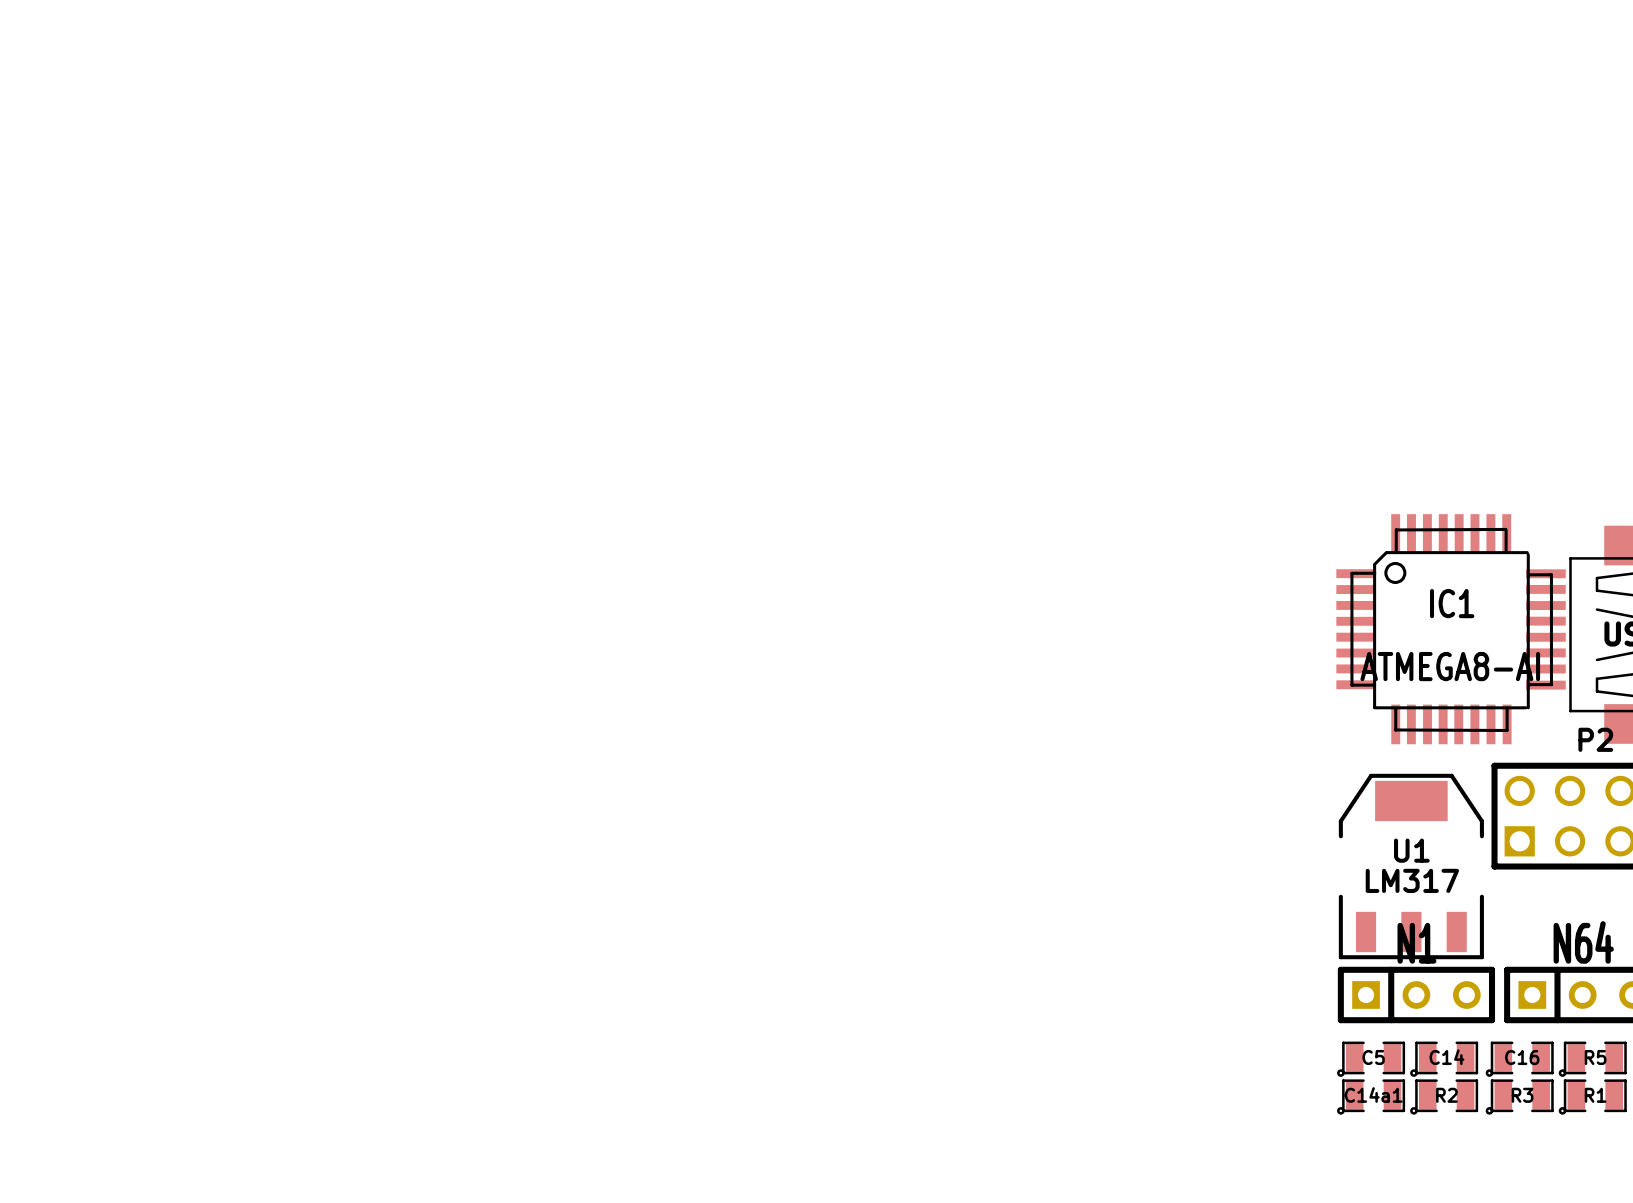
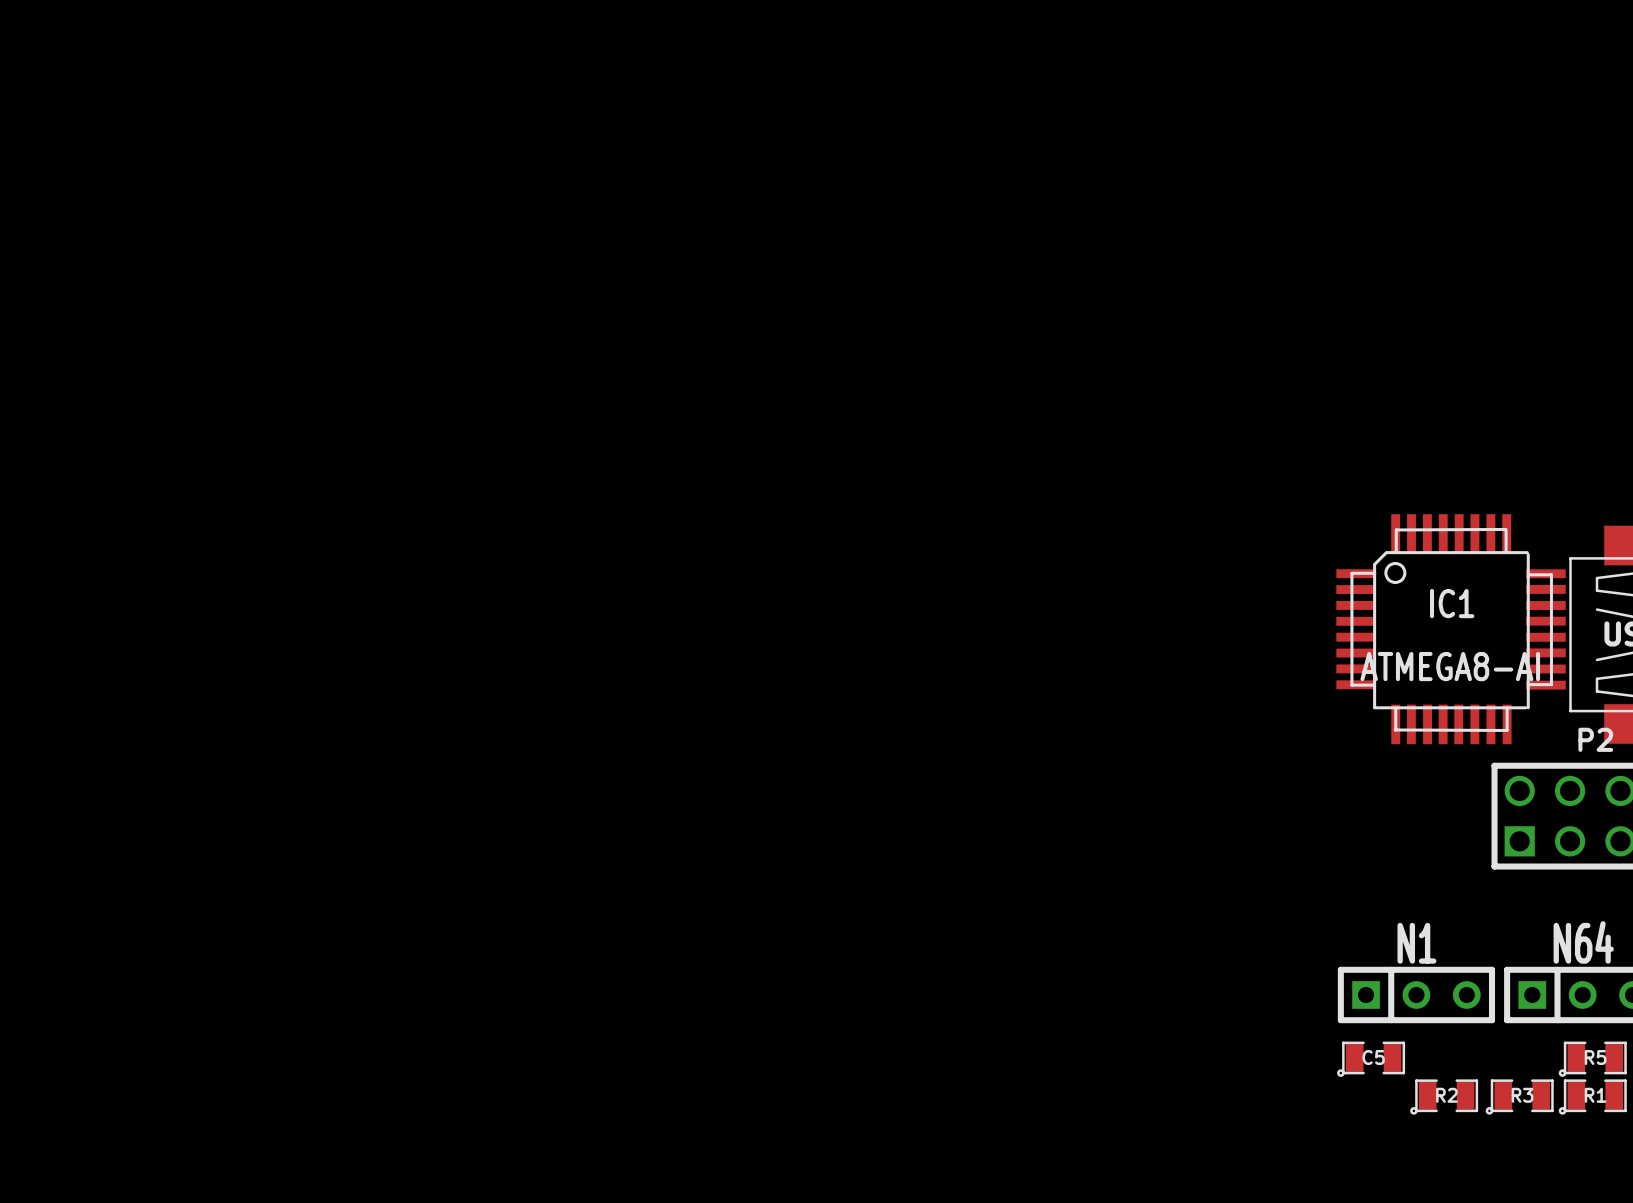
U1: LM317 (1411, 866) -> none
C14: (1444, 1059) -> none
C16: (1519, 1059) -> none
C14a1: (1371, 1097) -> none

